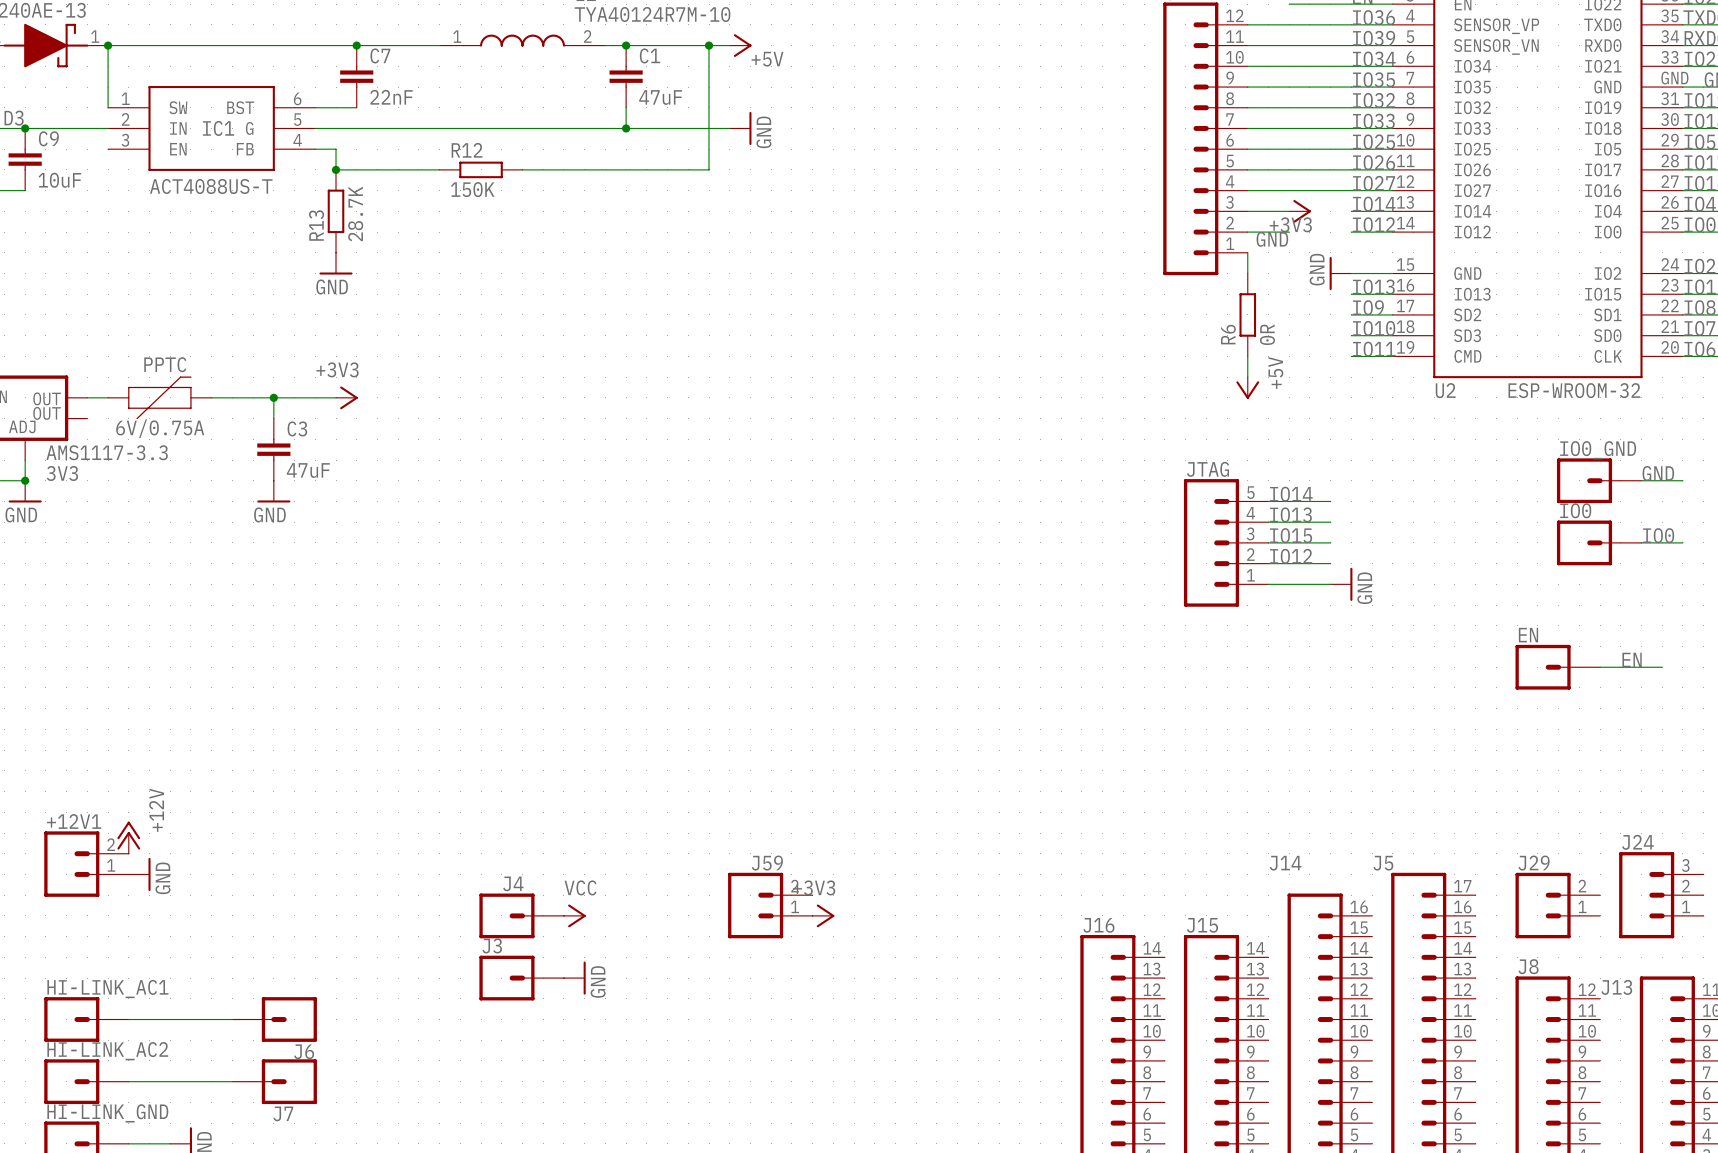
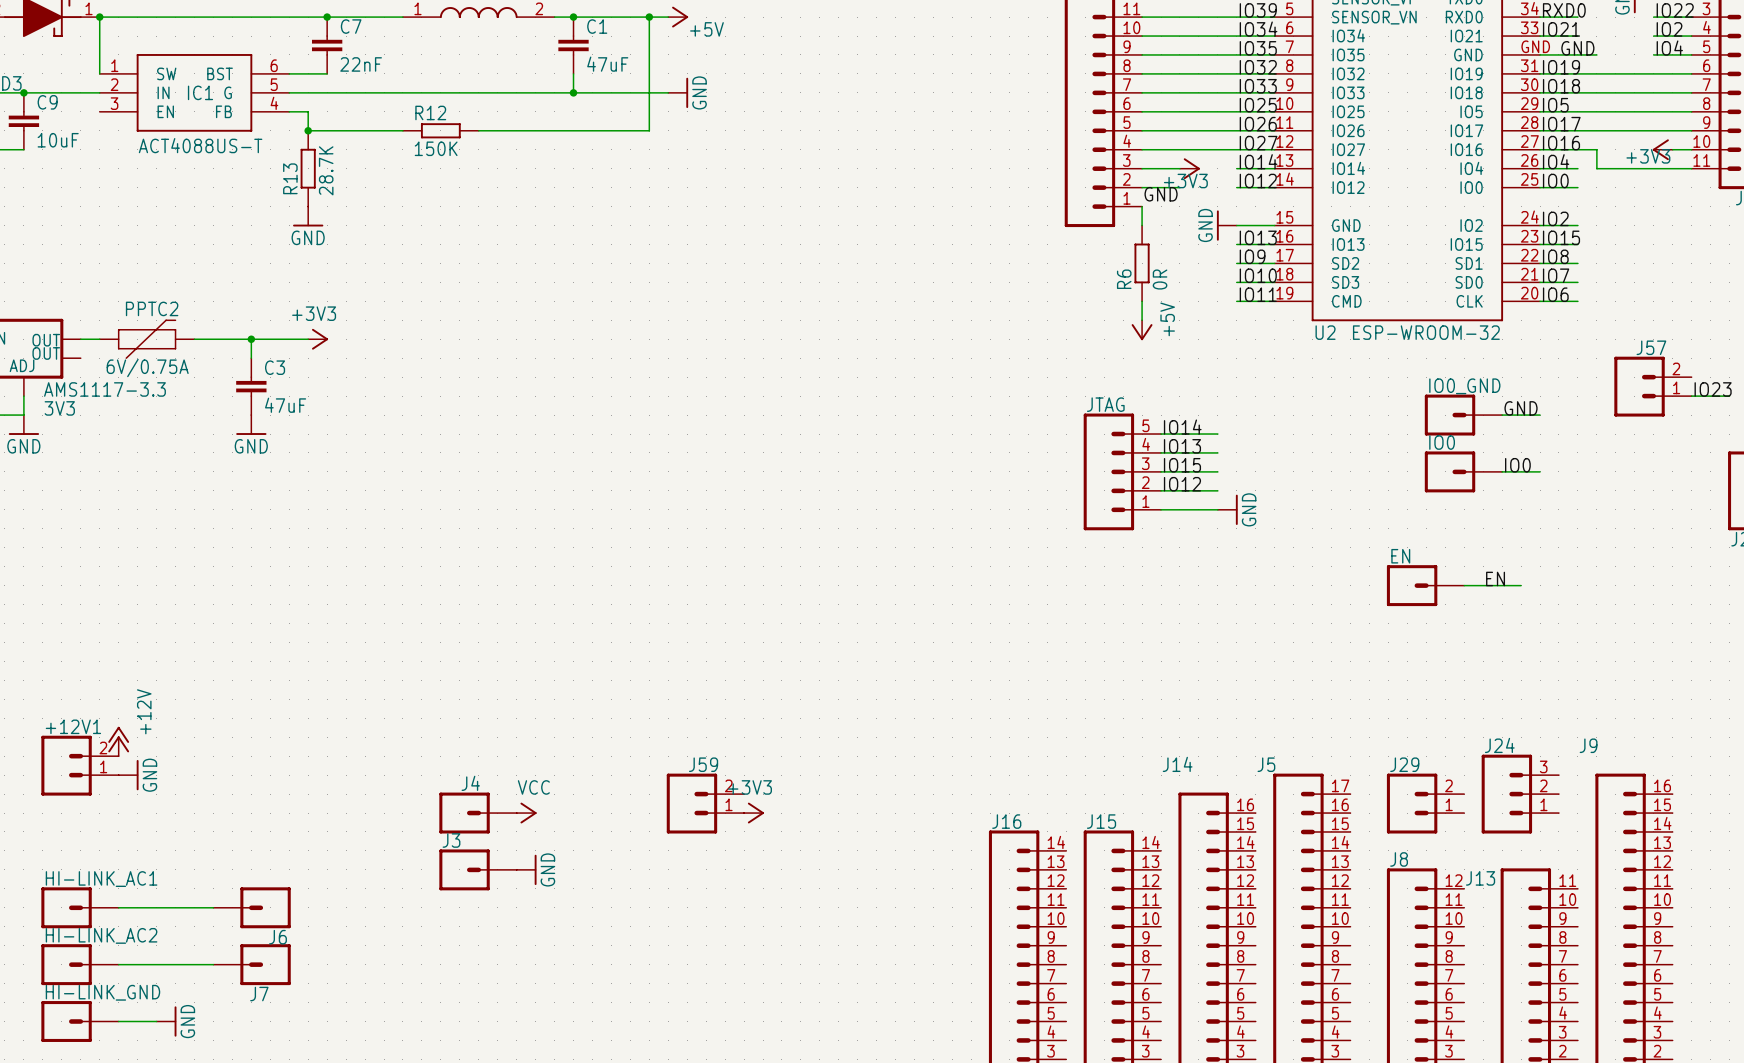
PPTC name: PPTC (165, 364) -> PPTC2 (152, 308)
junction: (25, 480) -> none

